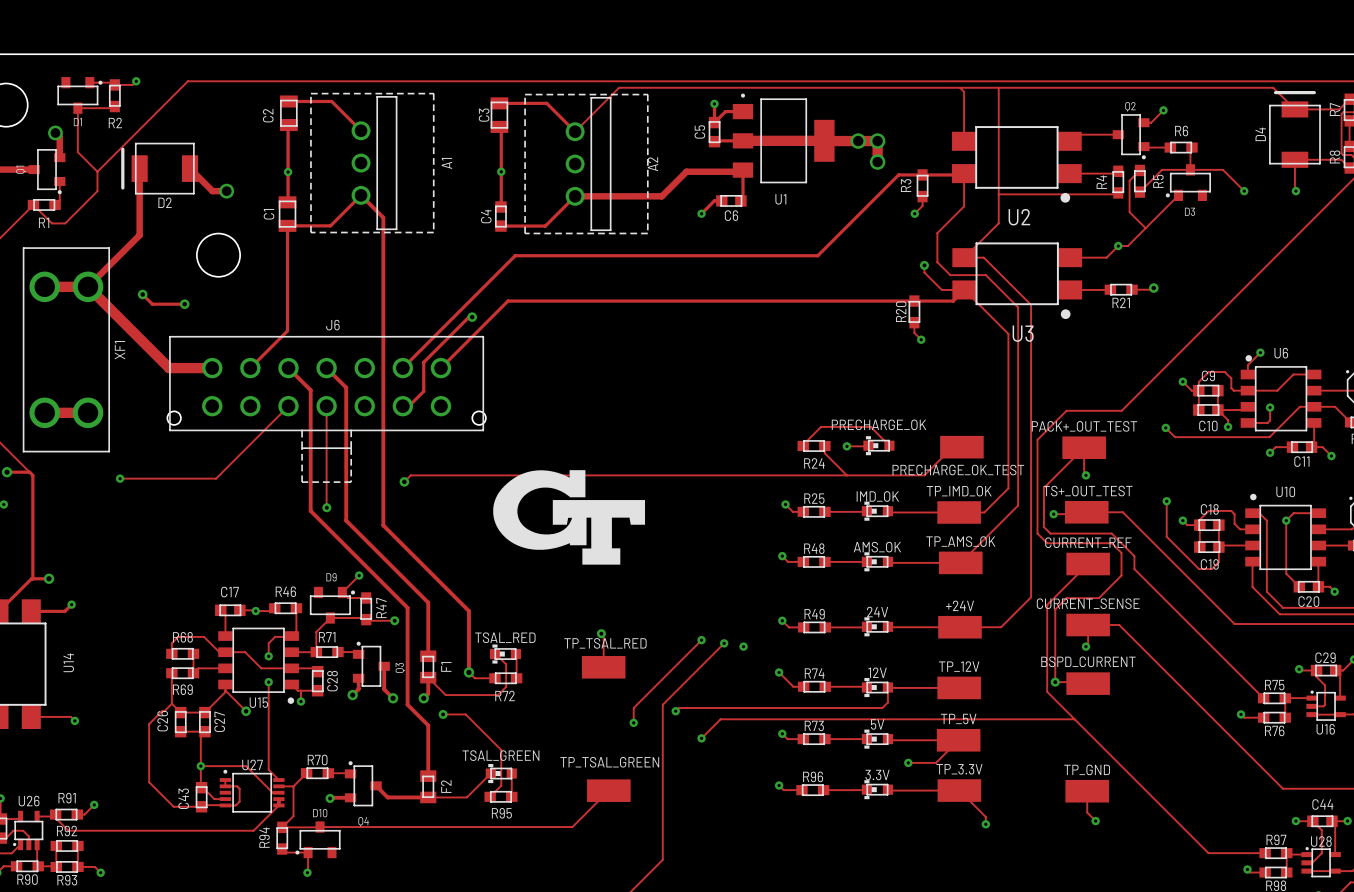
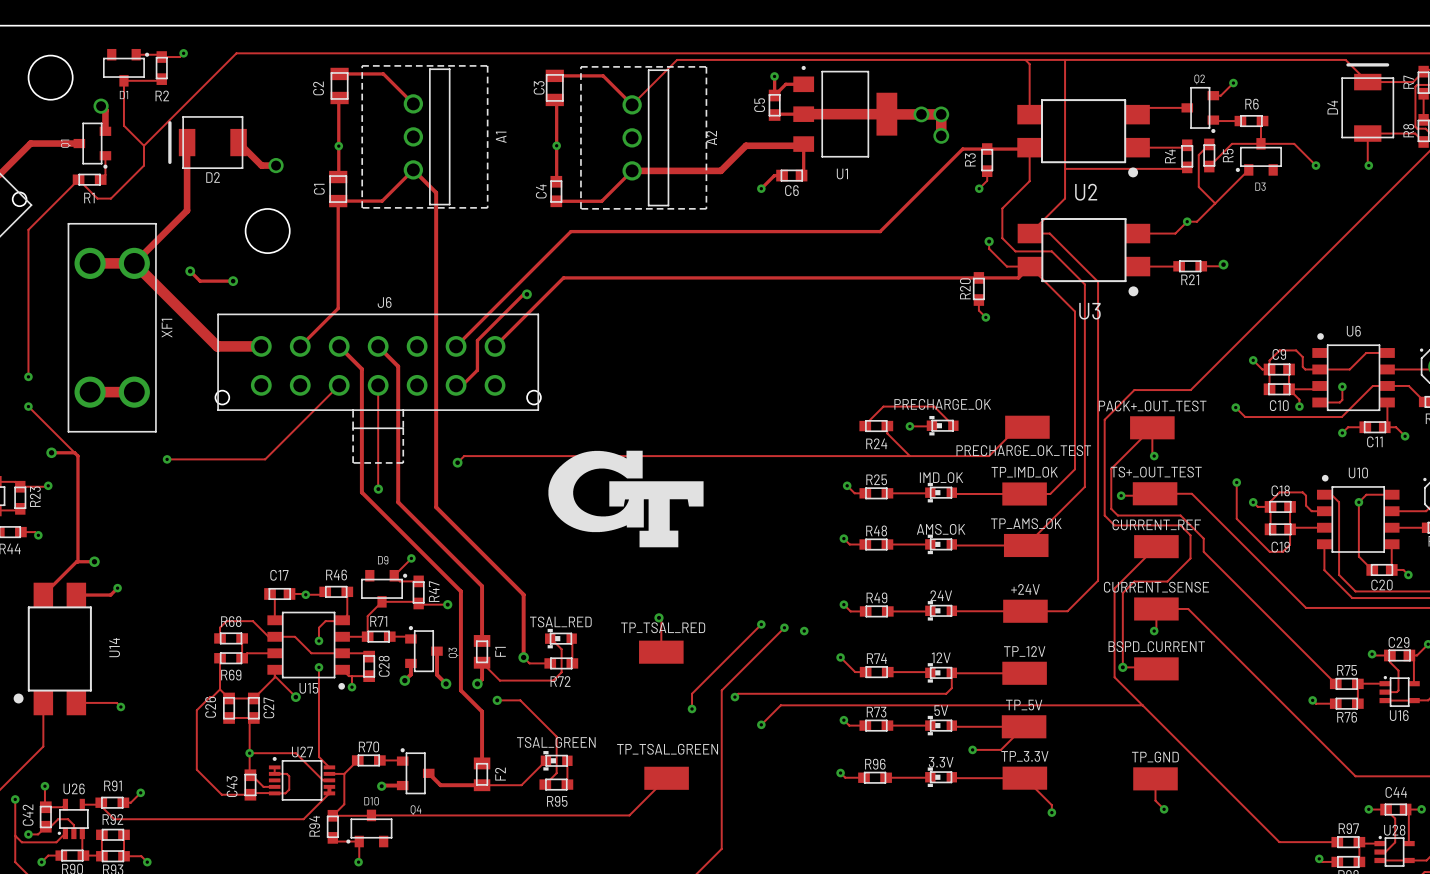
track: (1260, 352) (1247, 365) (1247, 374) -> none
via: (1260, 352) -> none

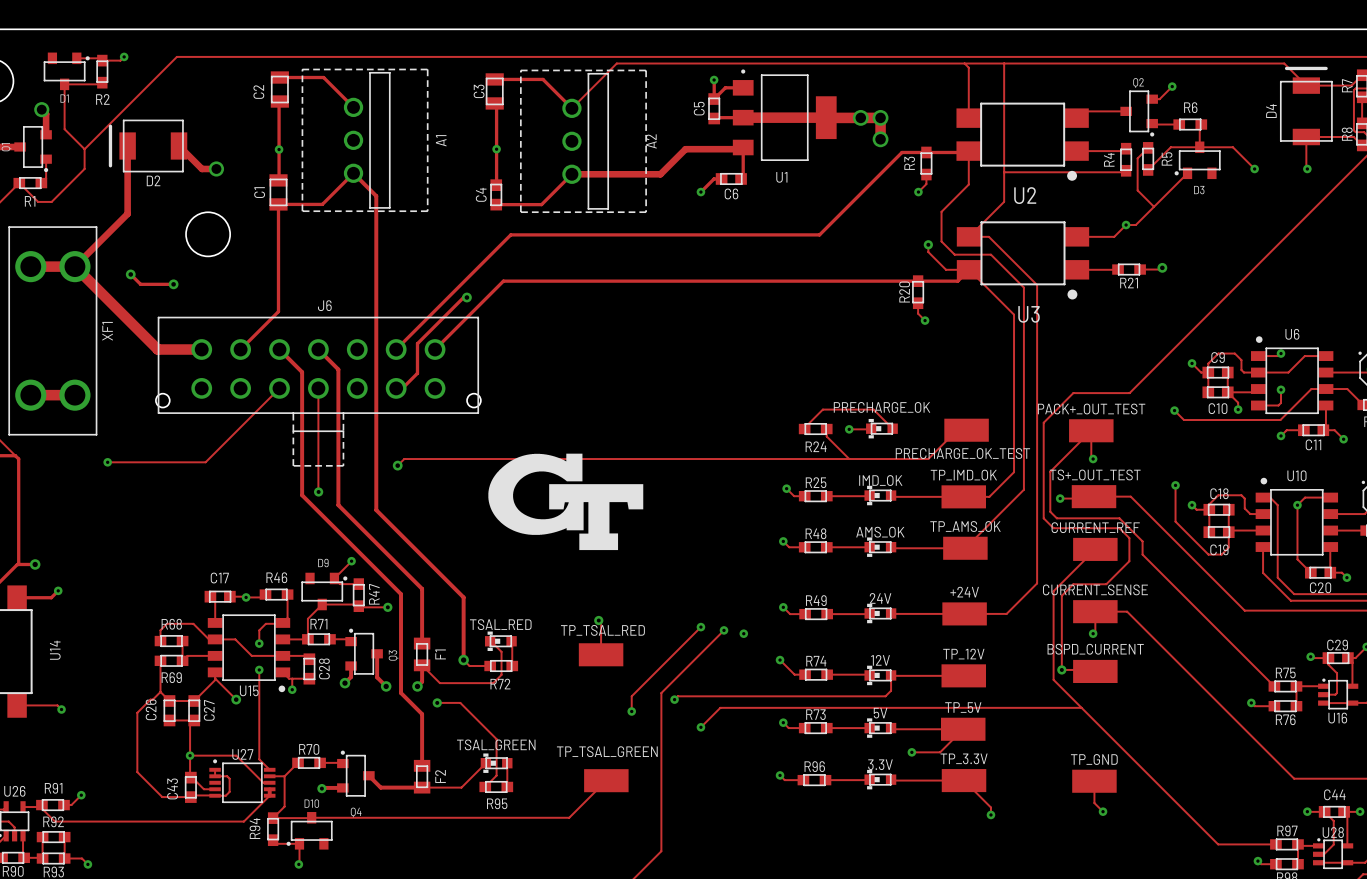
track: none -> (1281, 353) (1278, 356) (1258, 356)
via: none -> (1281, 353)

